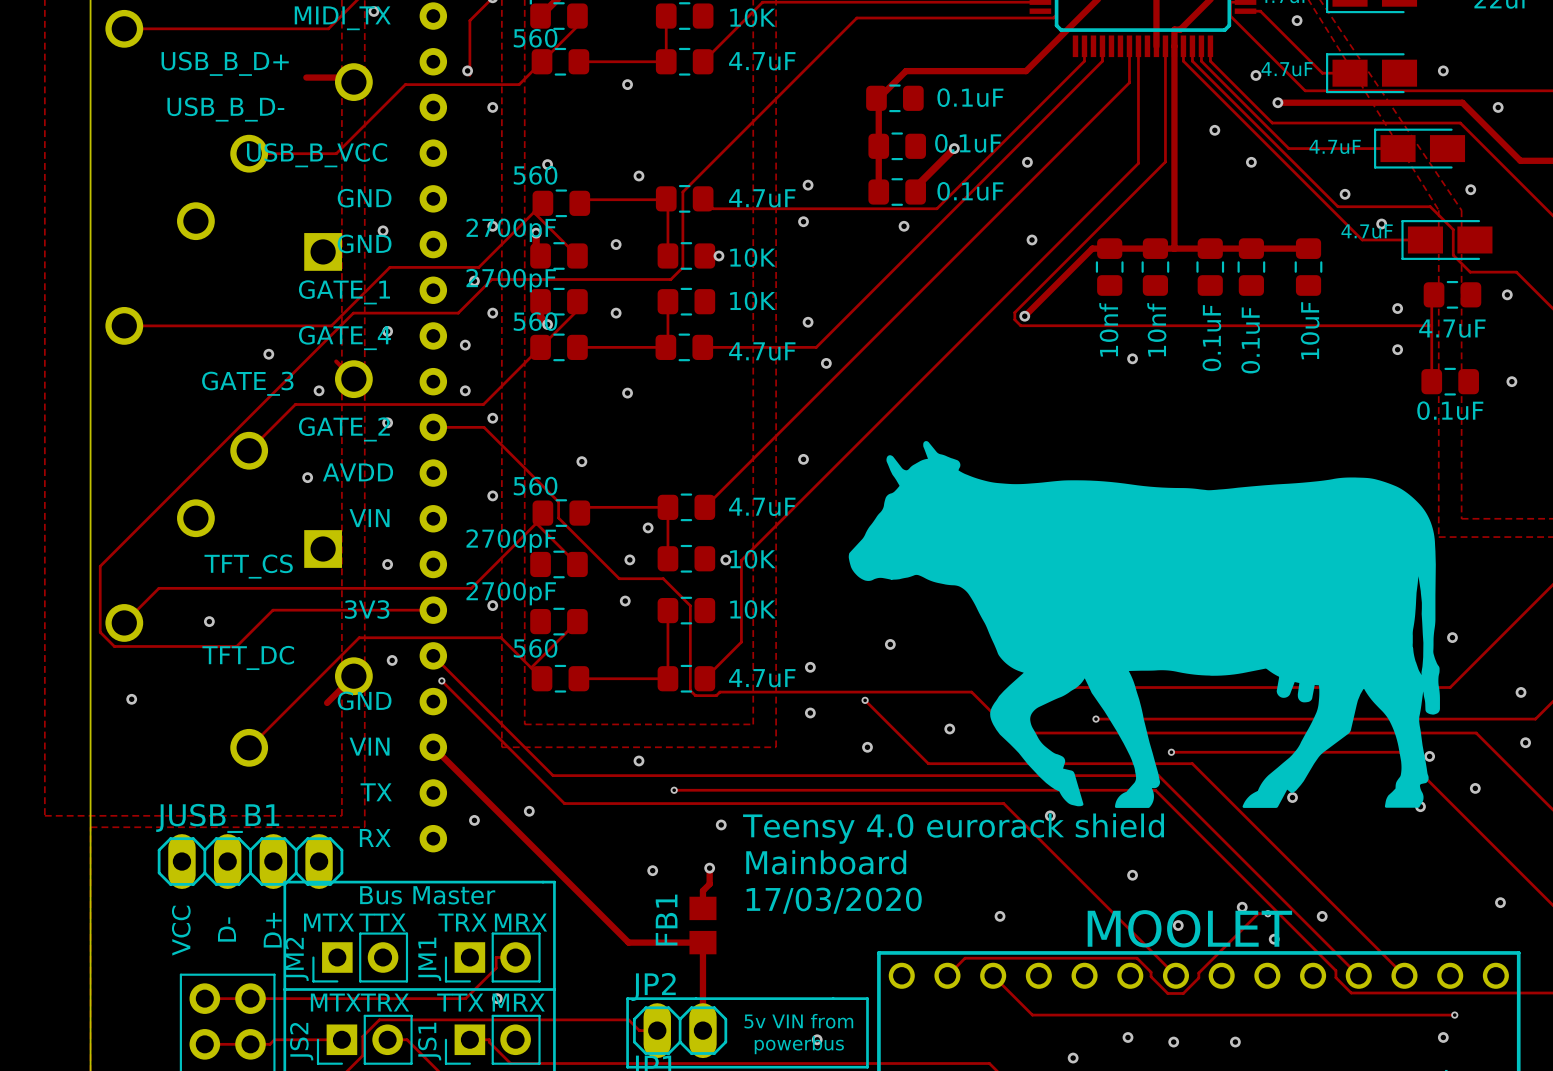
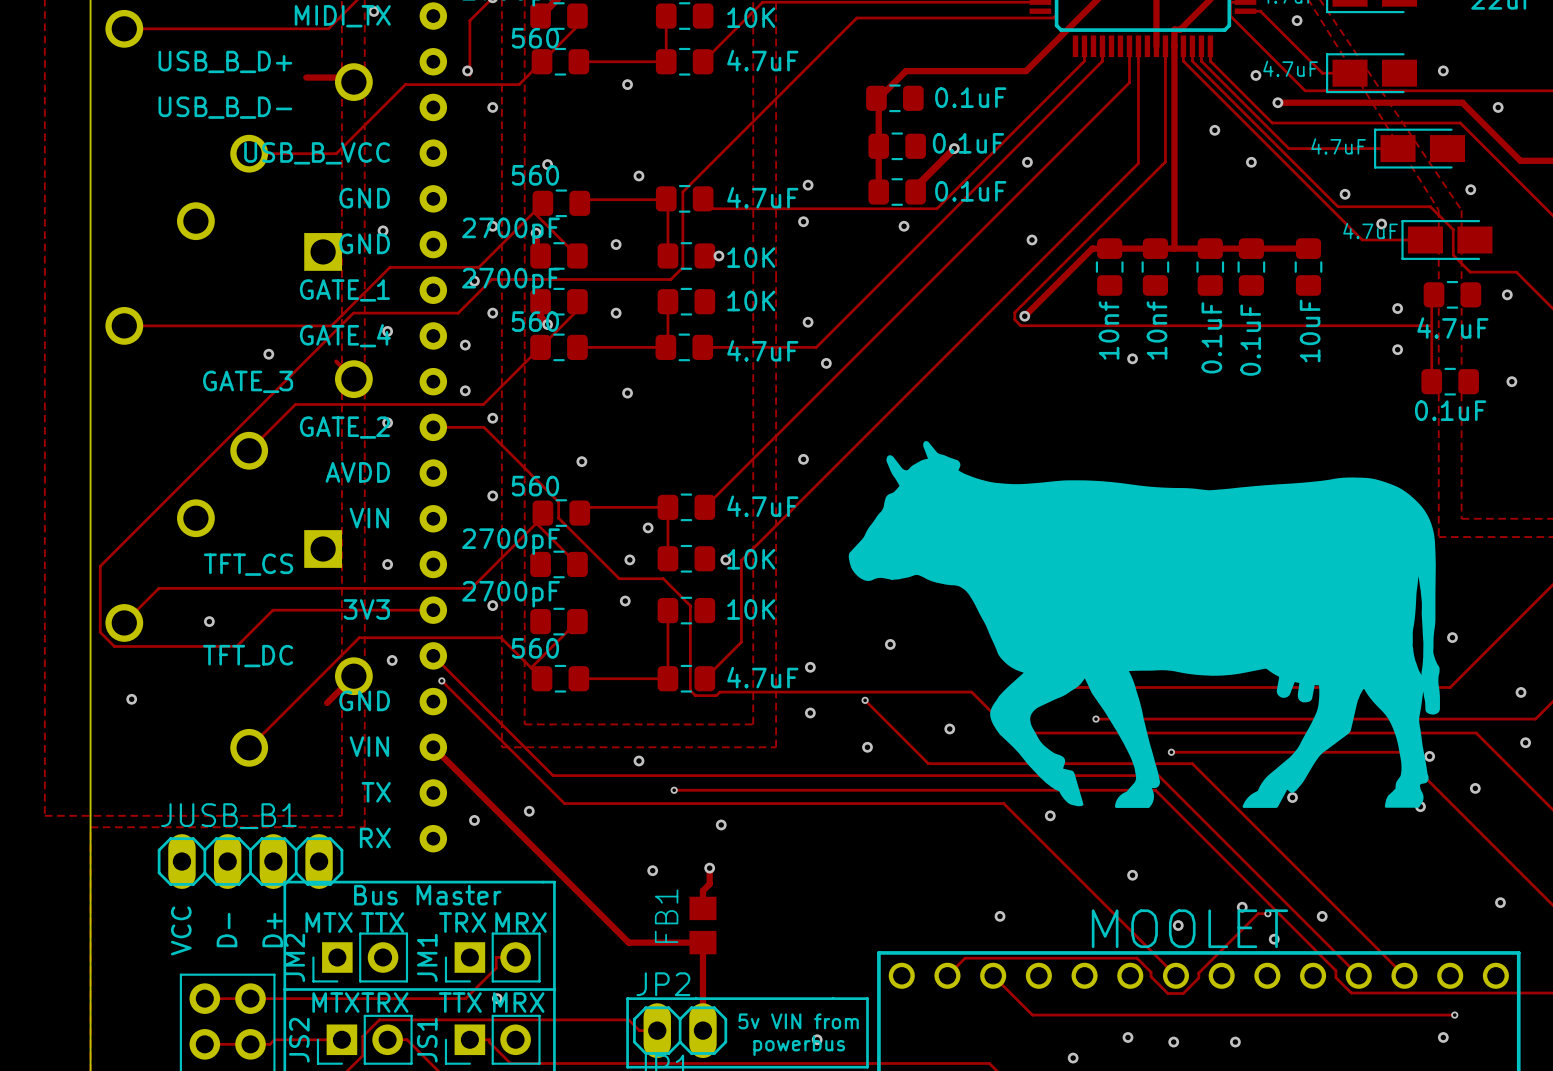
via: (319, 390) -> none
via: (307, 477) -> none
text: Teensy 4.0 eurorack shield (953, 828) -> none
text: Mainboard (826, 862) -> none
text: 17/03/2020 (834, 900) -> none

